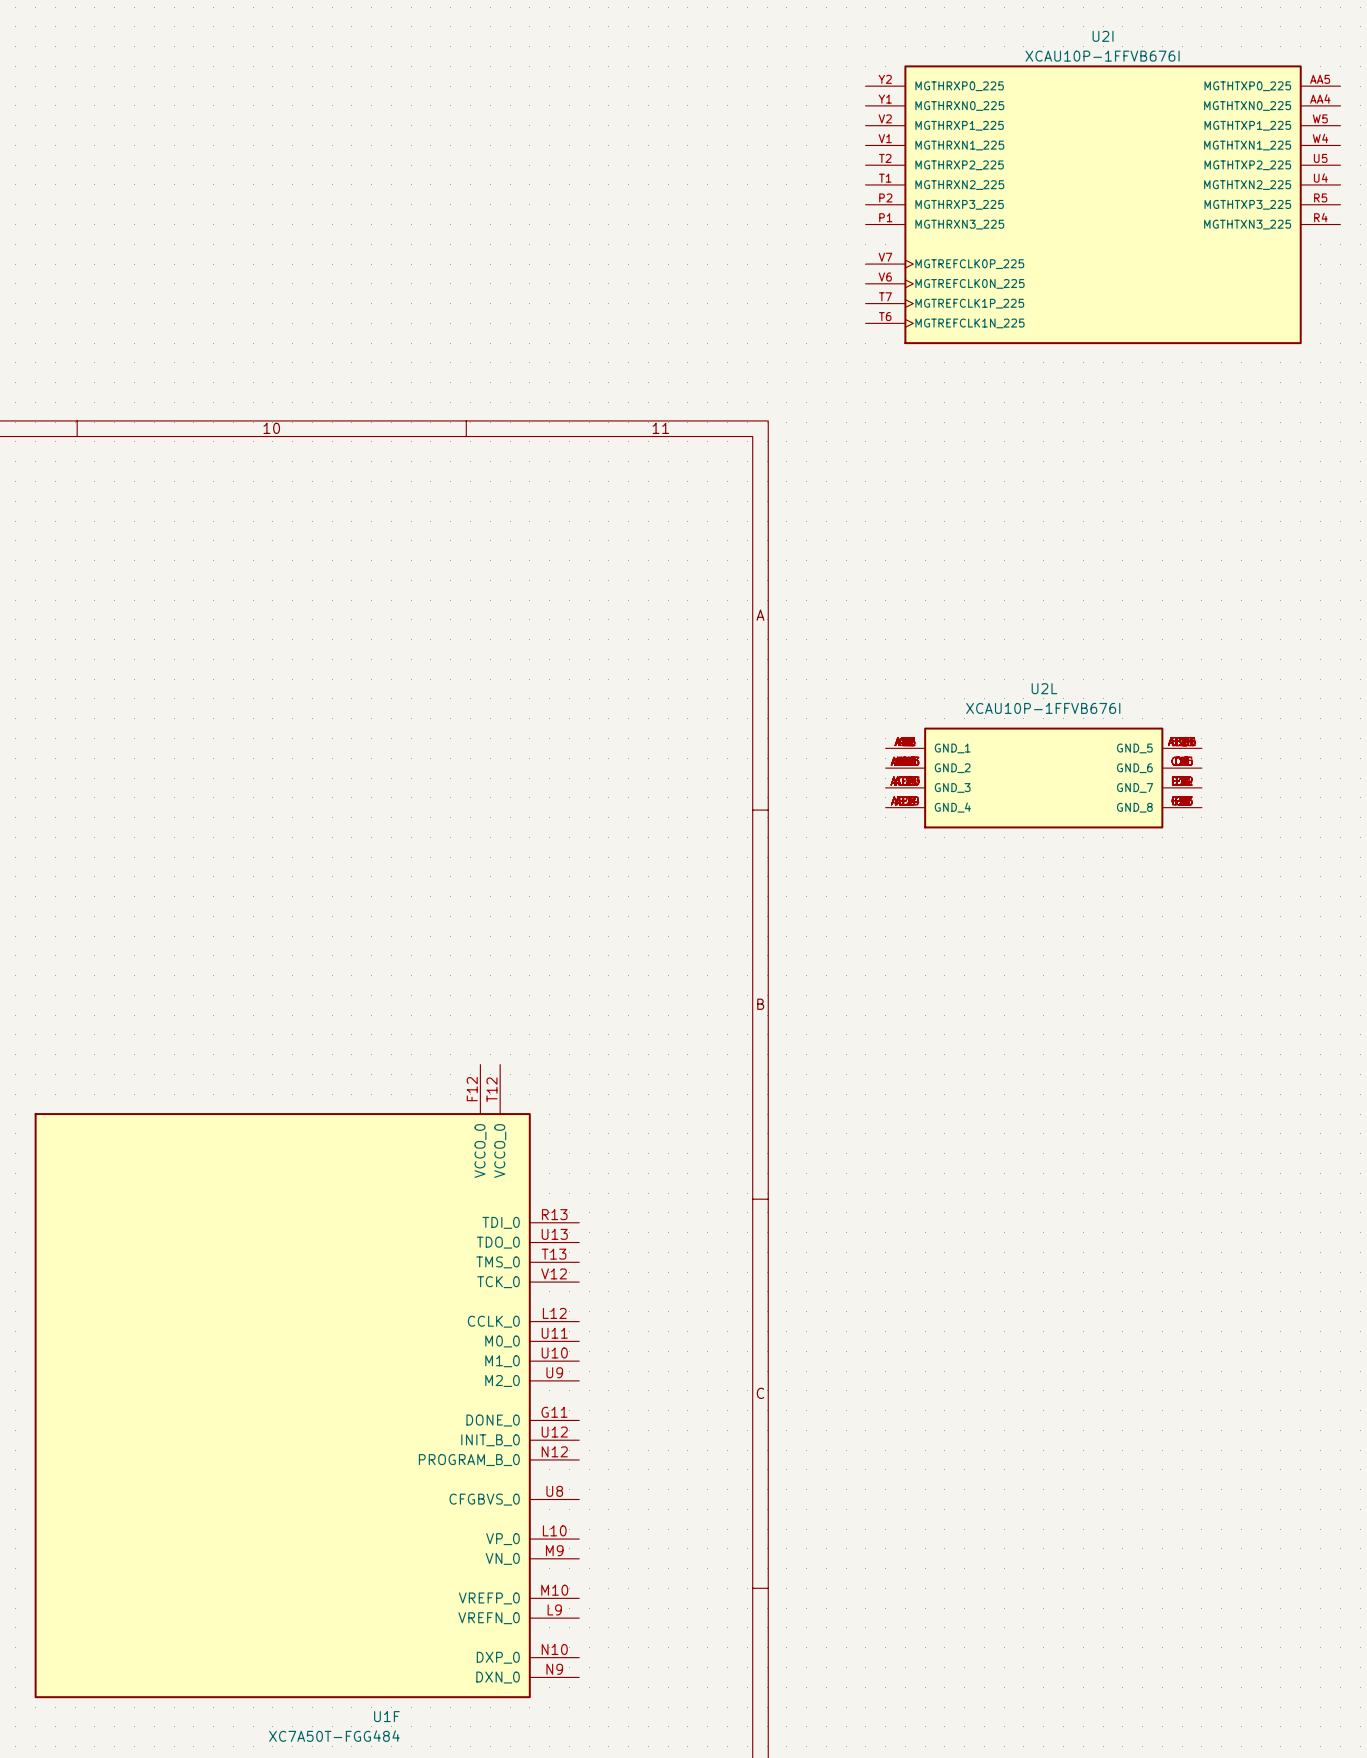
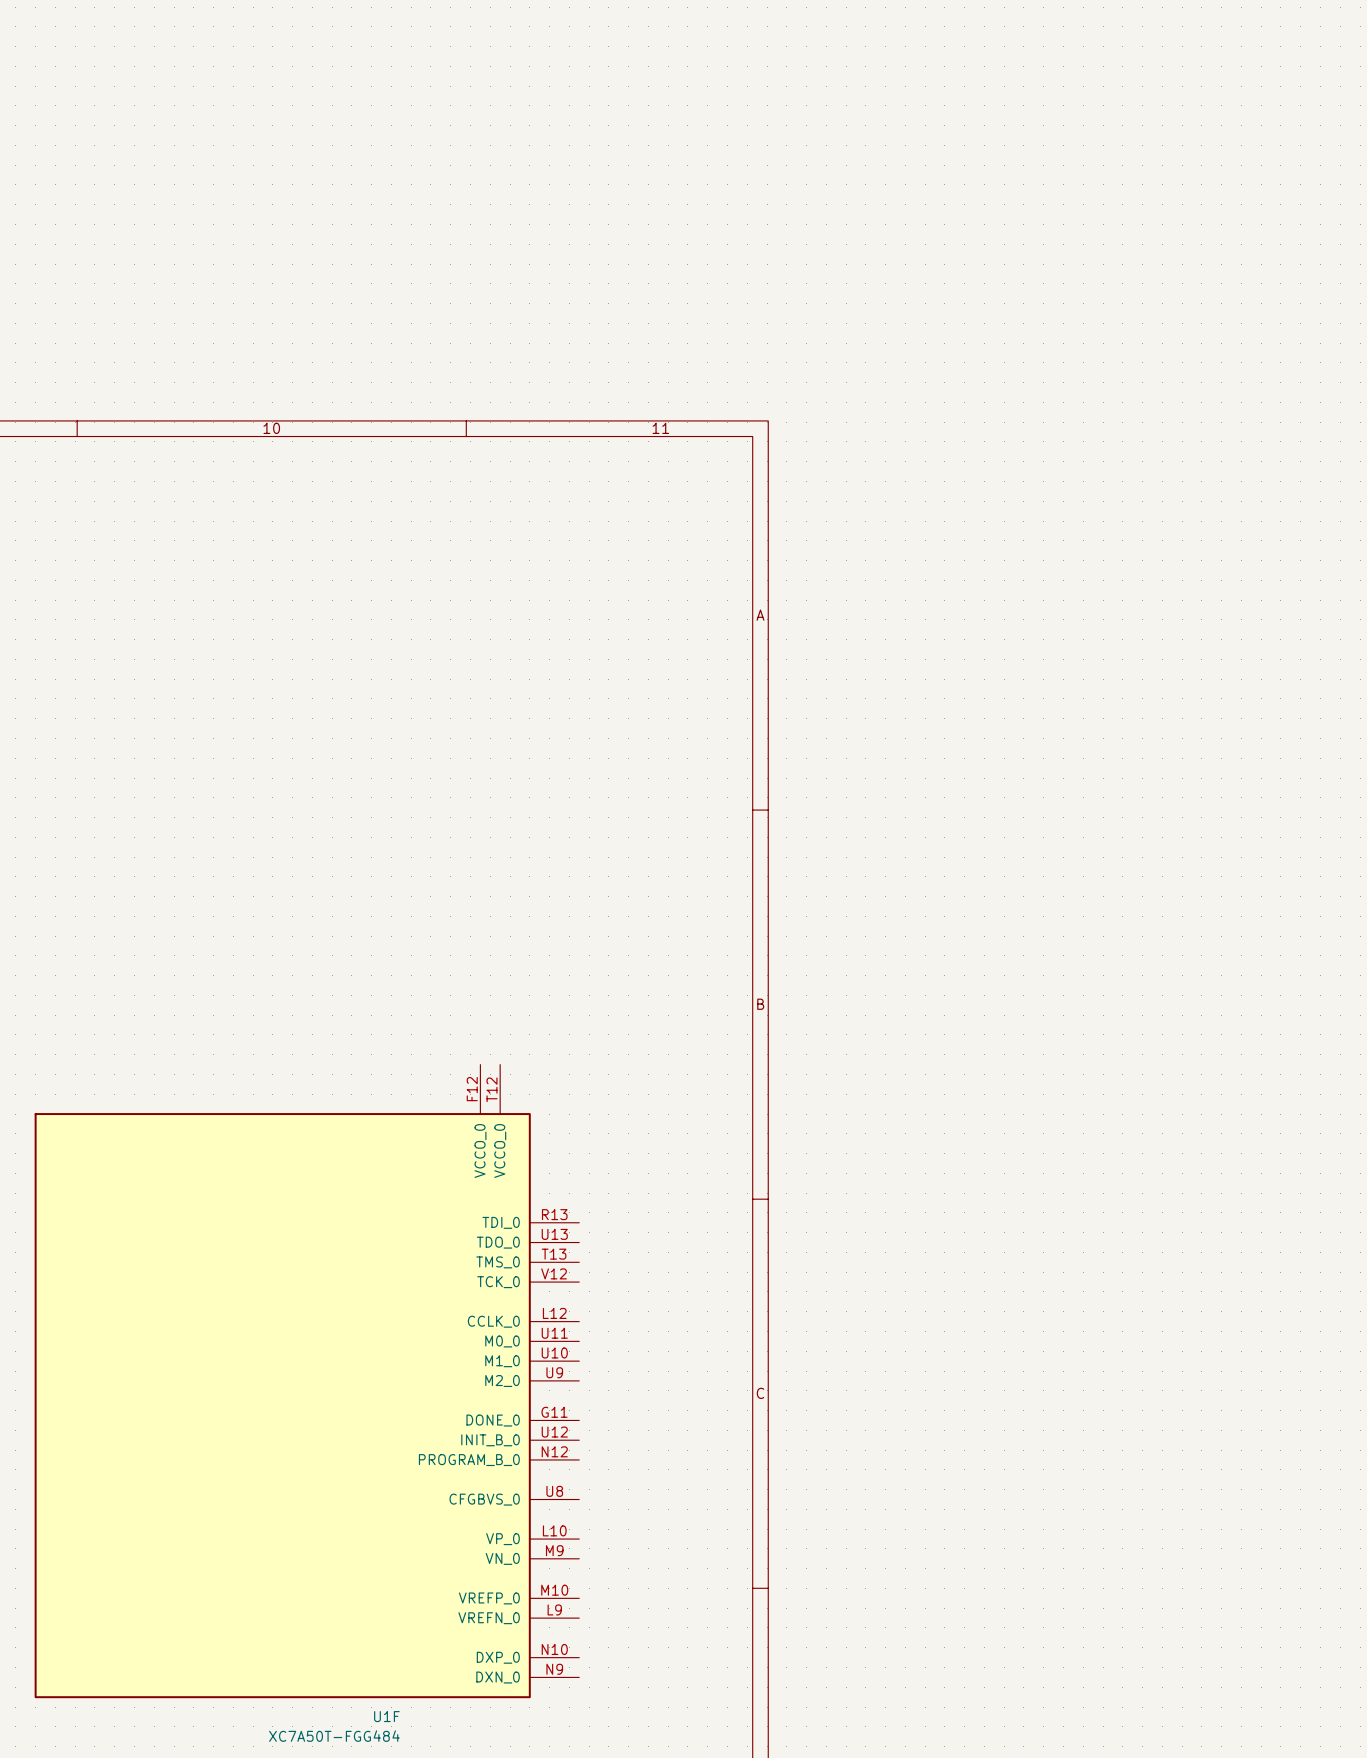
U2I: XCAU10P-1FFVB676I (1103, 204) -> none
U2L: XCAU10P-1FFVB676I (1043, 778) -> none

